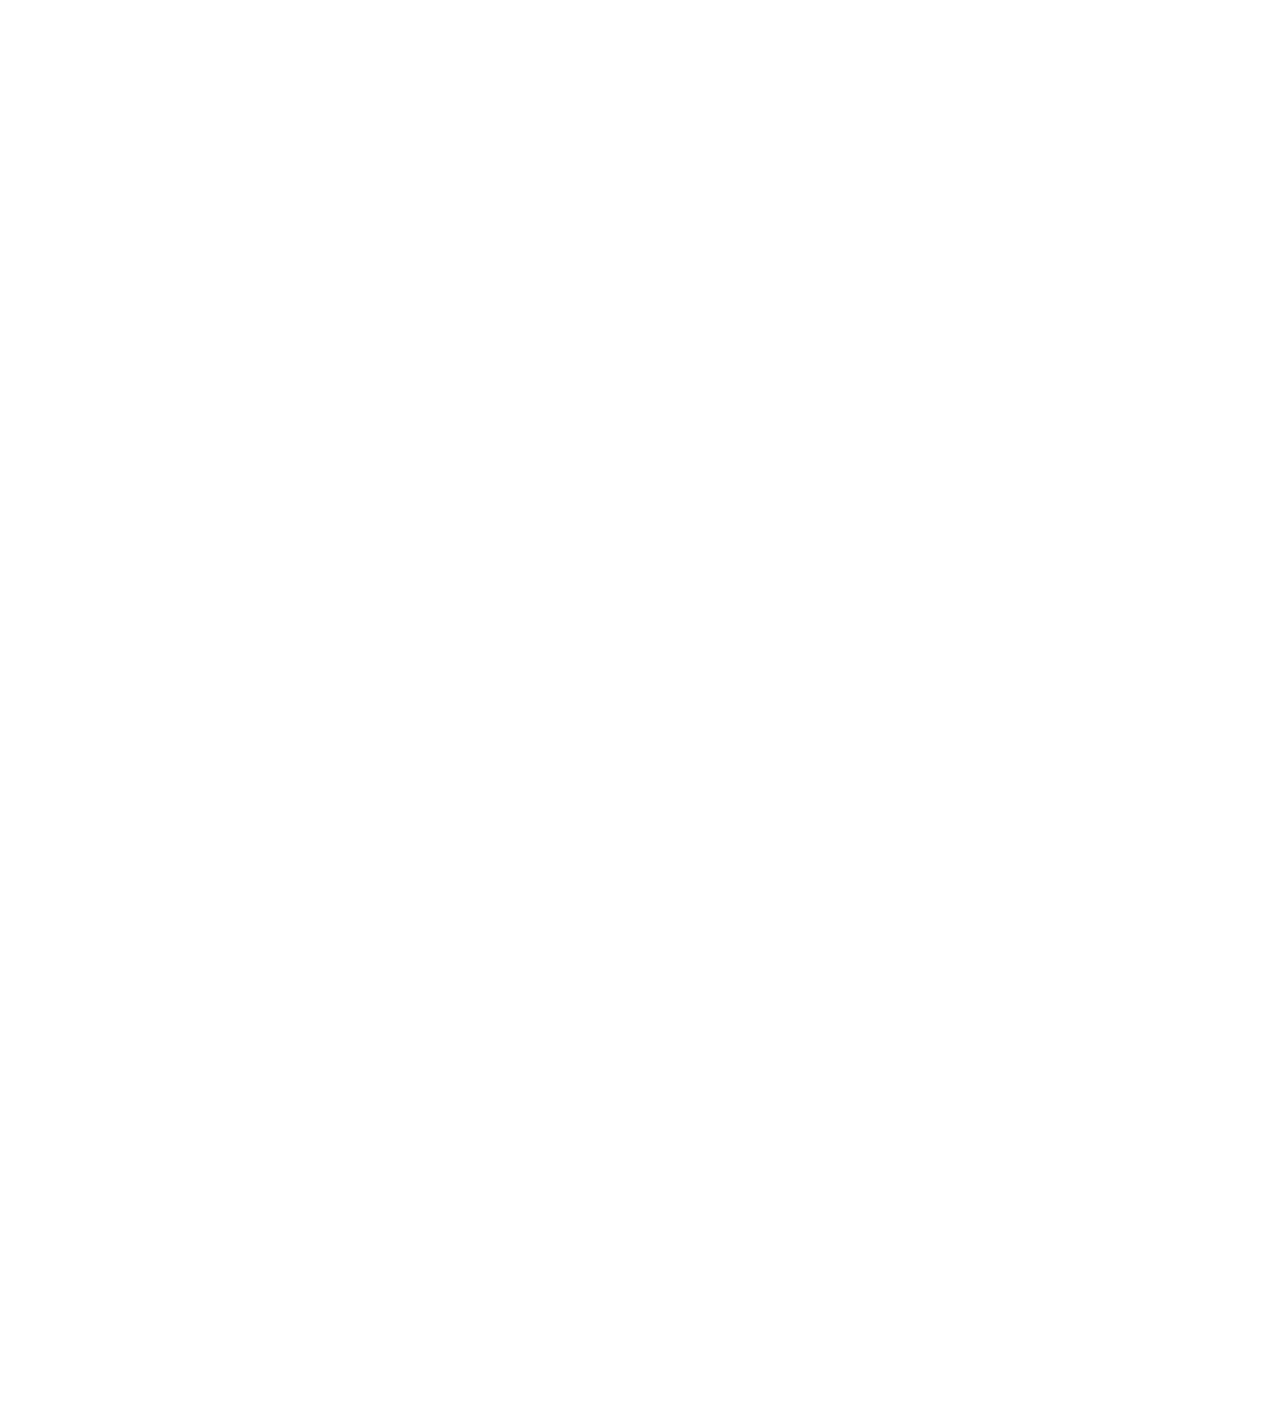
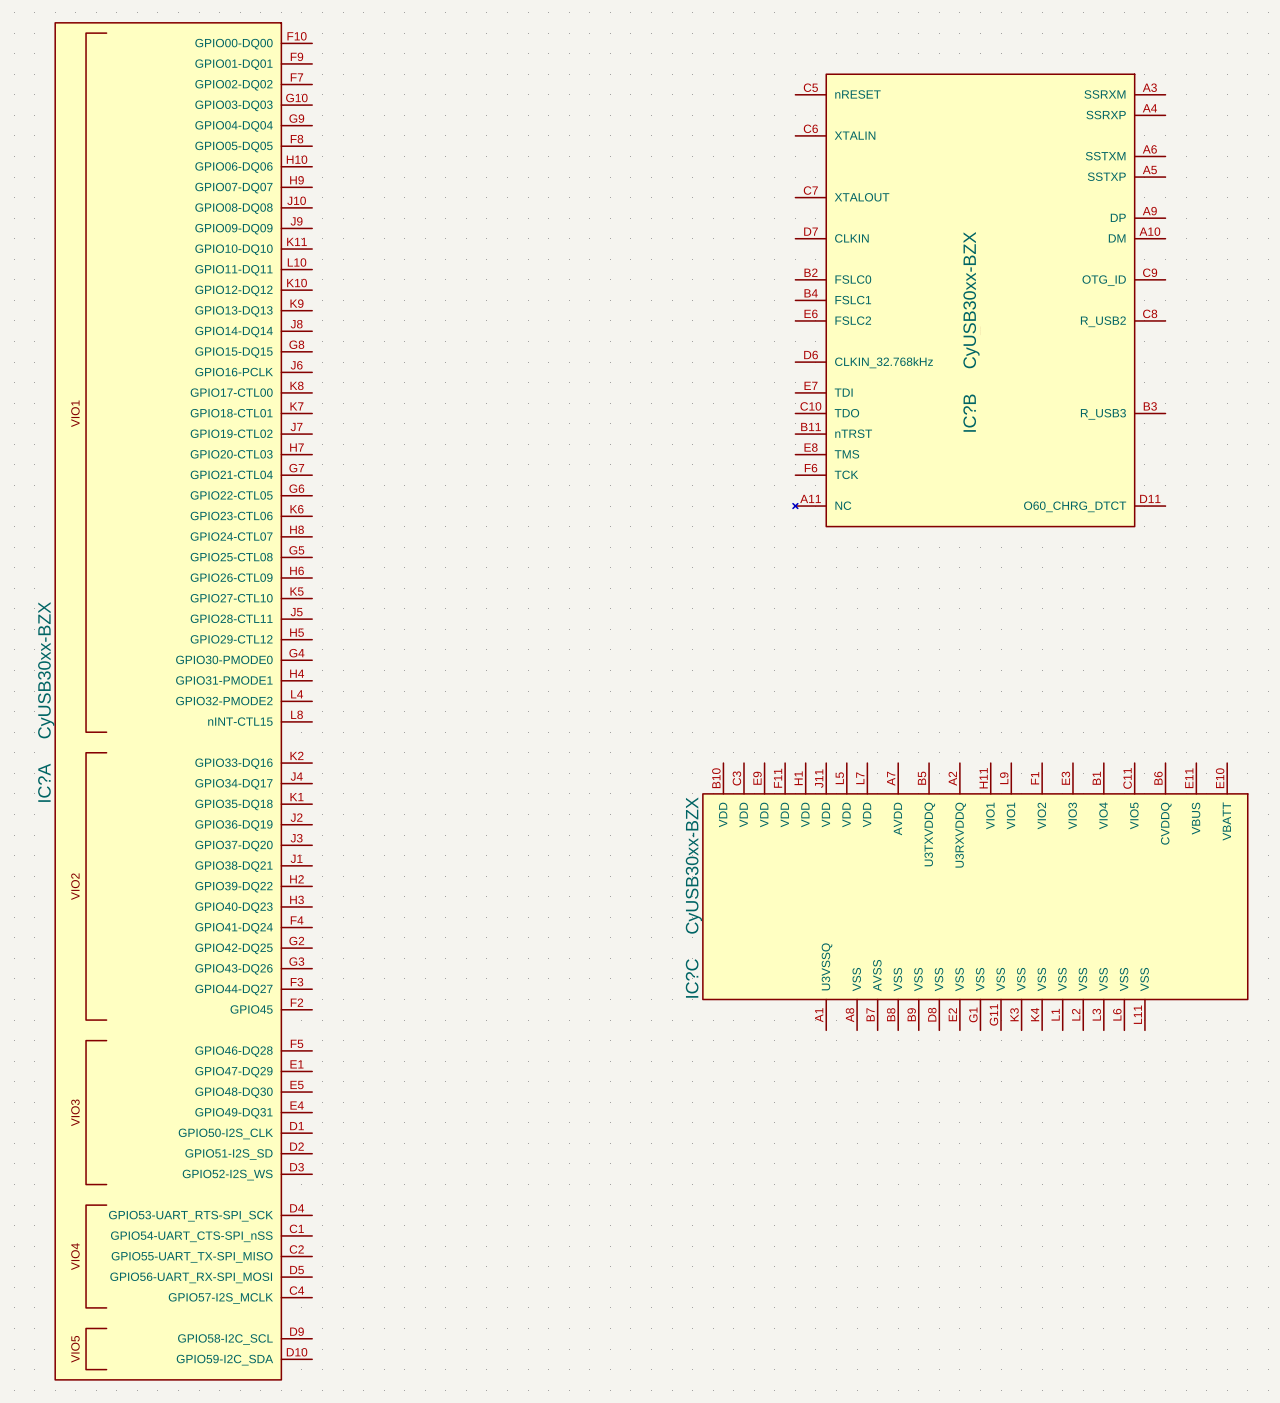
IC?B: none -> CyUSB30xx-BZX (979, 300)
IC?A: none -> CyUSB30xx-BZX (183, 701)
IC?C: none -> CyUSB30xx-BZX (975, 896)

